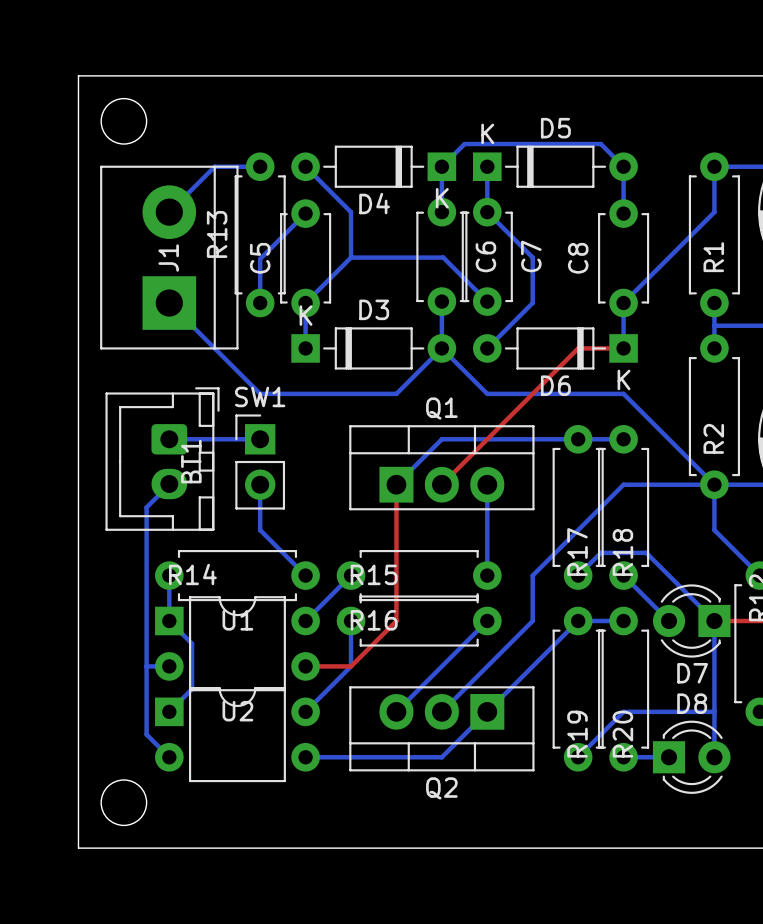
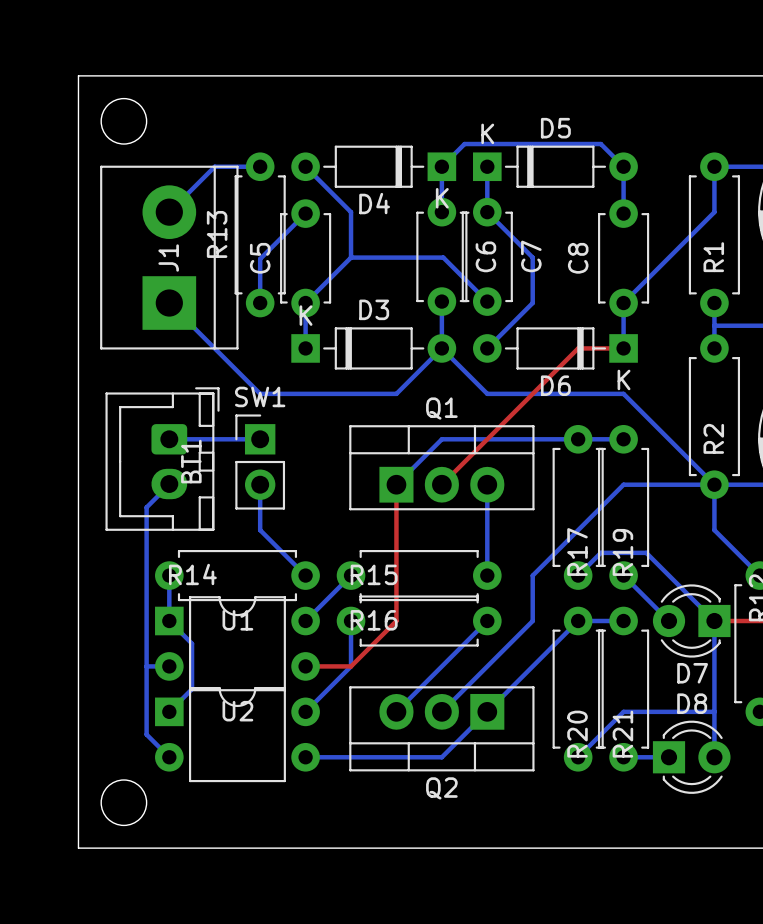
R18 name: R18 (622, 552) -> R19 (622, 552)
R19 name: R19 (577, 734) -> R20 (577, 734)
R20 name: R20 (622, 734) -> R21 (622, 734)

